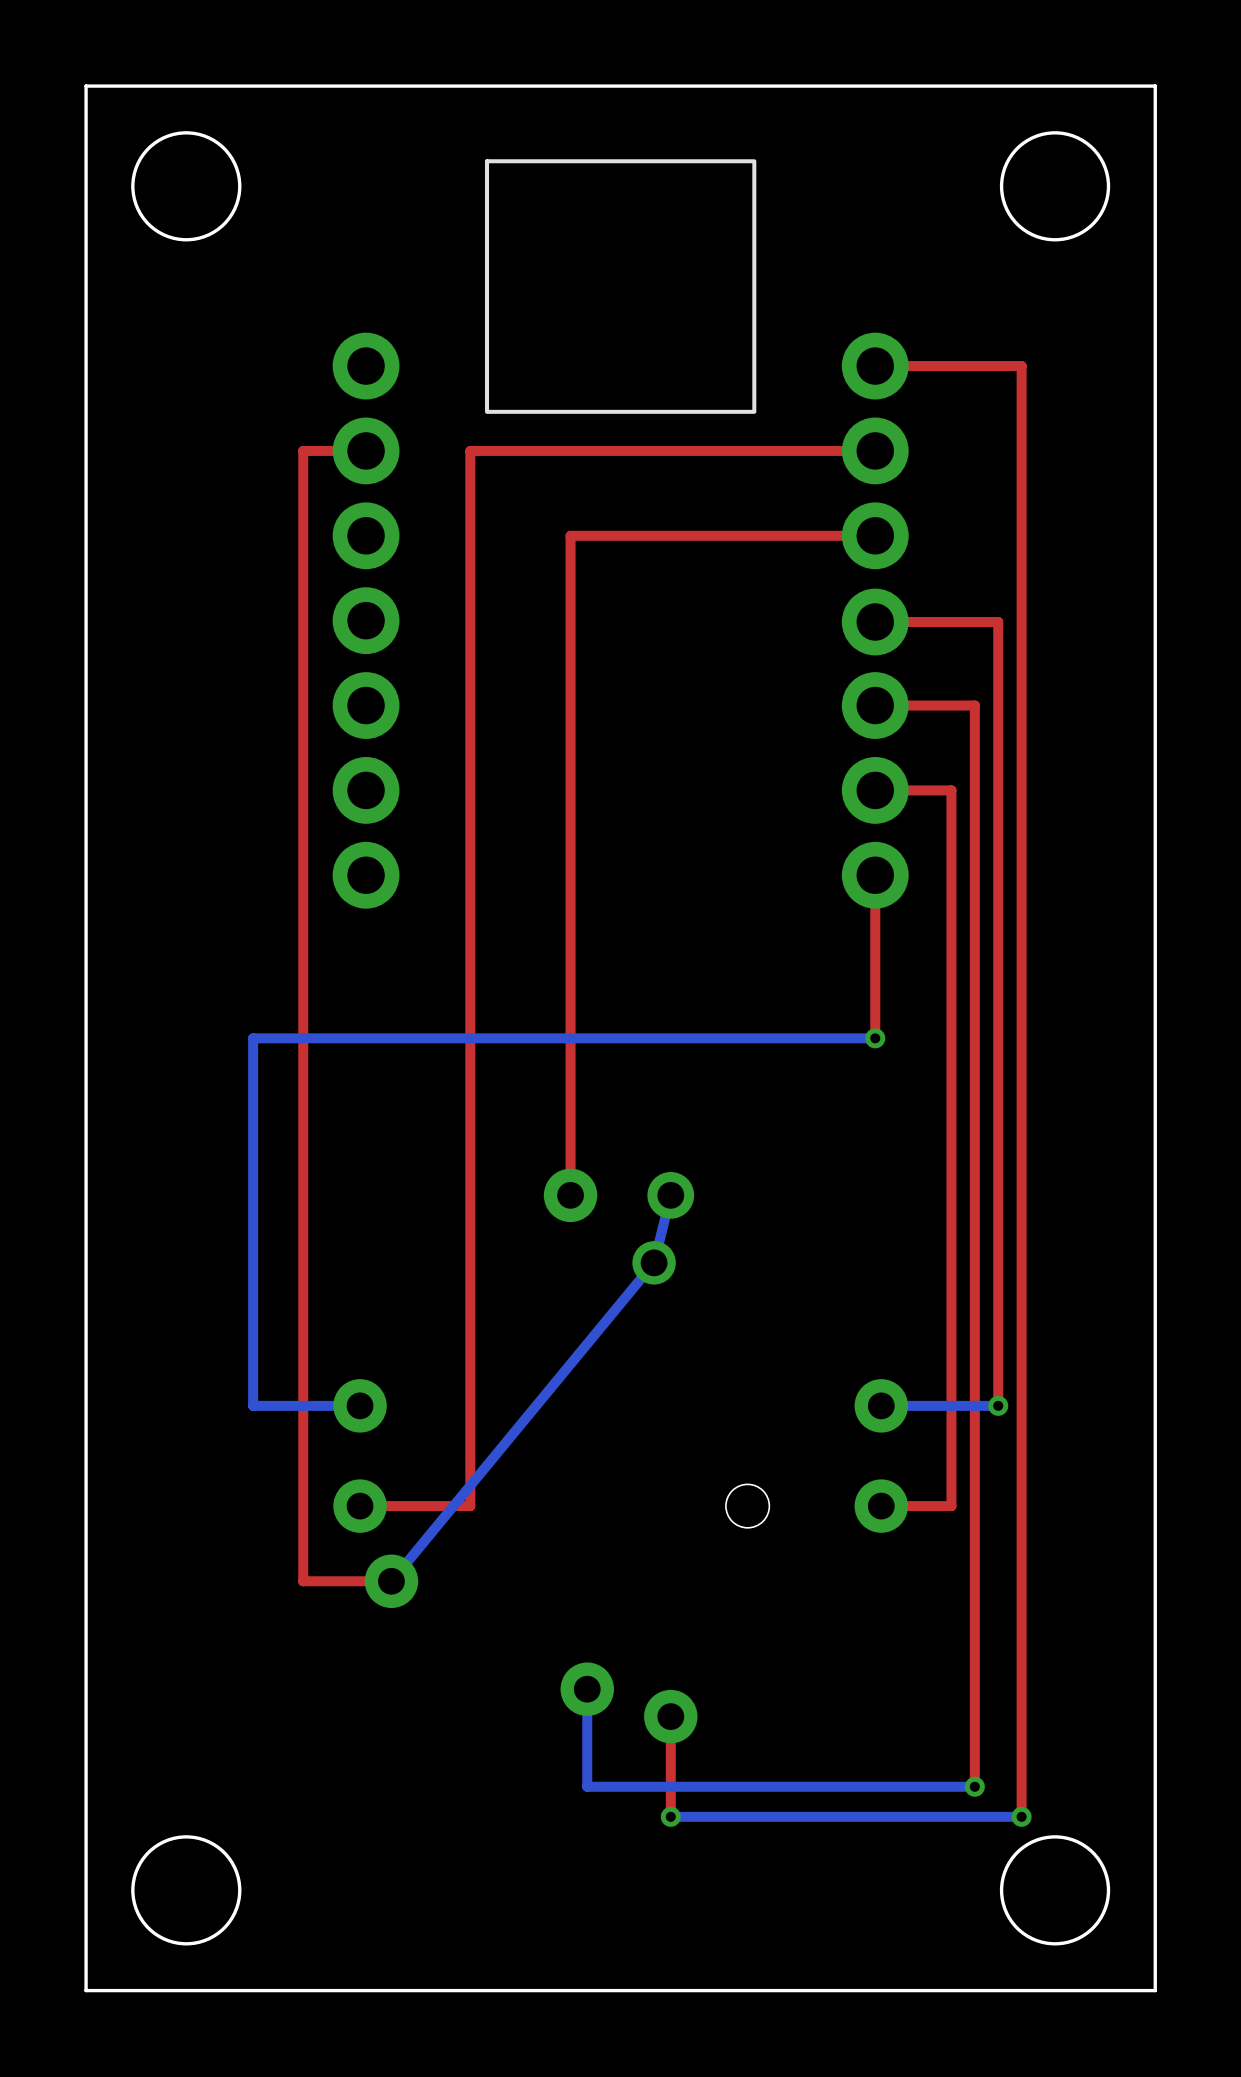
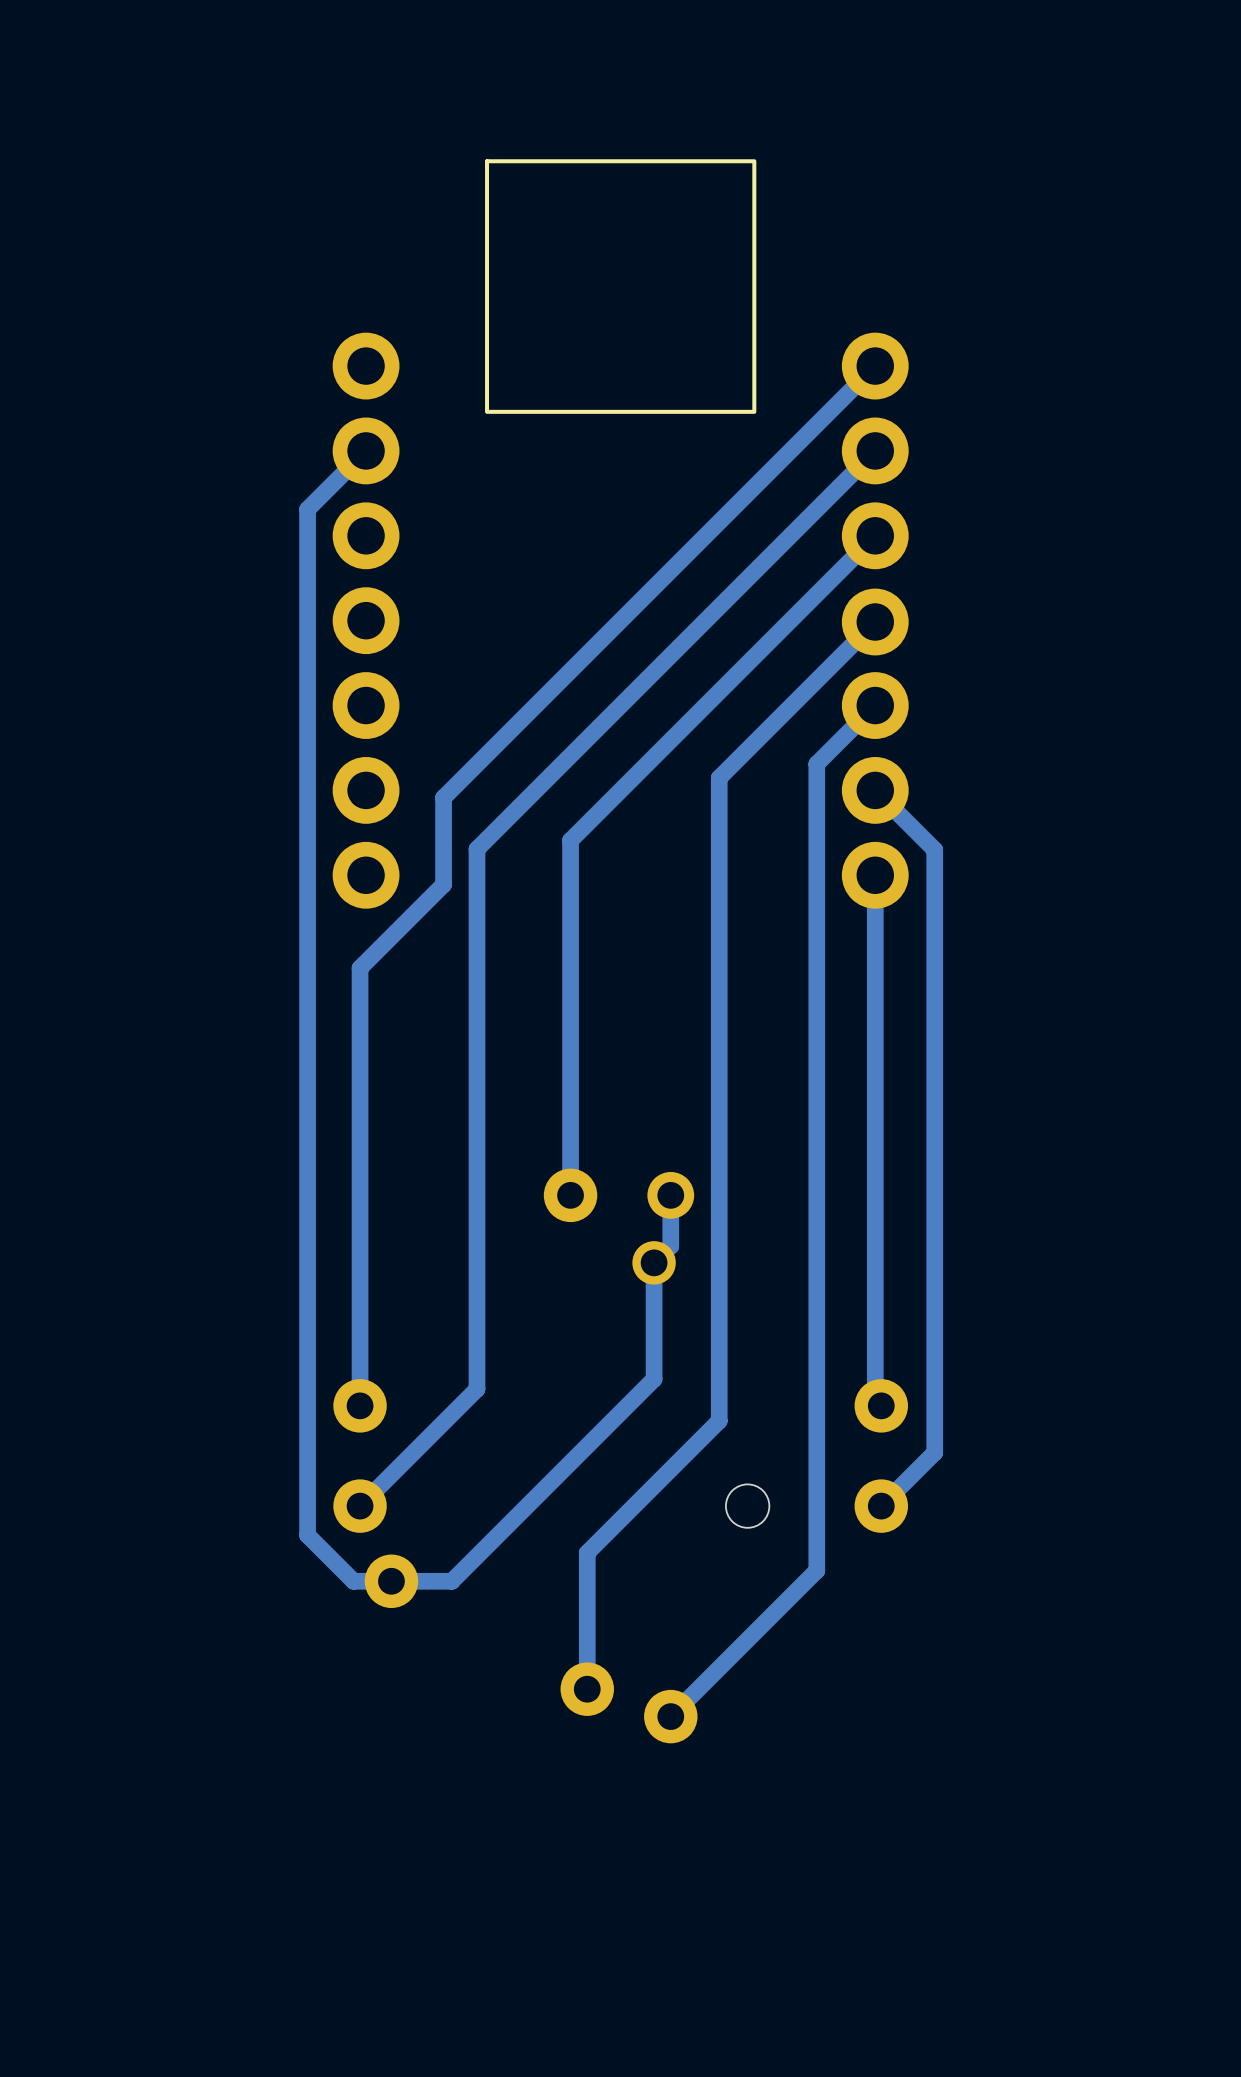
board edge: (1155, 86) (86, 86) (86, 1990) (1155, 1990) (1155, 86) -> none
round board edge: [131, 131, 242, 242] -> none
round board edge: [999, 131, 1111, 242] -> none
top track: (875, 366) (1021, 366) (1021, 1816) -> none
top track: (366, 450) (303, 450) (303, 1581) (391, 1581) -> none
top track: (875, 450) (470, 450) (470, 1506) (360, 1506) -> none
bottom track: none -> (875, 450) (477, 849) (477, 1389) (360, 1506)
top track: (875, 535) (570, 535) (570, 1195) -> none
bottom track: none -> (875, 535) (570, 840) (570, 1195)
top track: (875, 622) (998, 622) (998, 1405) -> none
top track: (875, 705) (974, 705) (974, 1786) -> none
bottom track: none -> (875, 705) (816, 764) (816, 1570) (670, 1716)
top track: (875, 790) (951, 790) (951, 1506) (881, 1506) -> none
bottom track: none -> (875, 790) (934, 849) (934, 1452) (881, 1506)
top track: (875, 875) (875, 1038) -> none
bottom track: (875, 1038) (253, 1038) (253, 1405) (360, 1405) -> (875, 366) (443, 797) (443, 884) (360, 968) (360, 1405)
via: (875, 1038) -> none
bottom track: (670, 1195) (654, 1262) (391, 1581) -> (670, 1195) (670, 1246) (654, 1262) (654, 1379) (451, 1581) (353, 1581) (307, 1535) (307, 509) (366, 450)
bottom track: (998, 1405) (881, 1405) -> (875, 875) (875, 1399) (881, 1405)
via: (998, 1405) -> none
bottom track: (587, 1689) (587, 1786) (974, 1786) -> (587, 1689) (587, 1552) (719, 1420) (719, 778) (875, 622)
top track: (670, 1716) (670, 1816) -> none
via: (974, 1786) -> none
via: (670, 1816) -> none
bottom track: (1021, 1816) (670, 1816) -> none
via: (1021, 1816) -> none
round board edge: [131, 1835, 242, 1946] -> none
round board edge: [999, 1835, 1111, 1946] -> none

